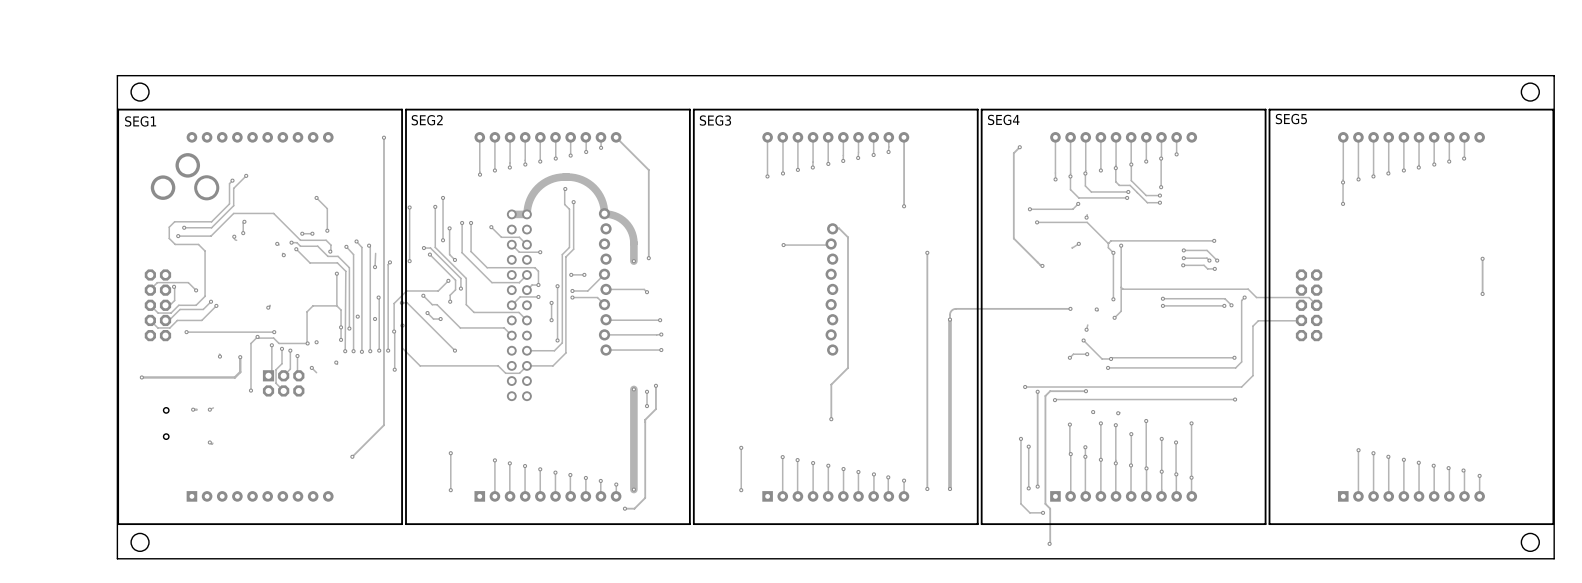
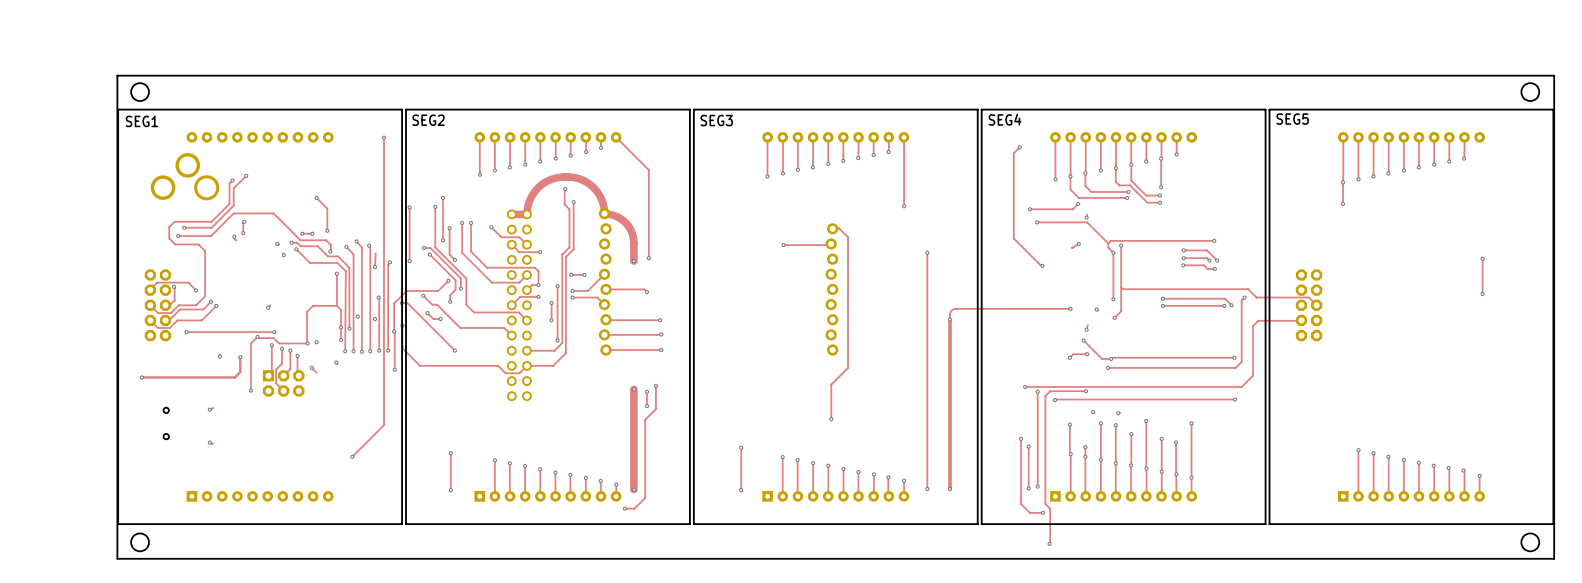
track: (193, 409) (196, 409) -> none
via: (193, 409) -> none

